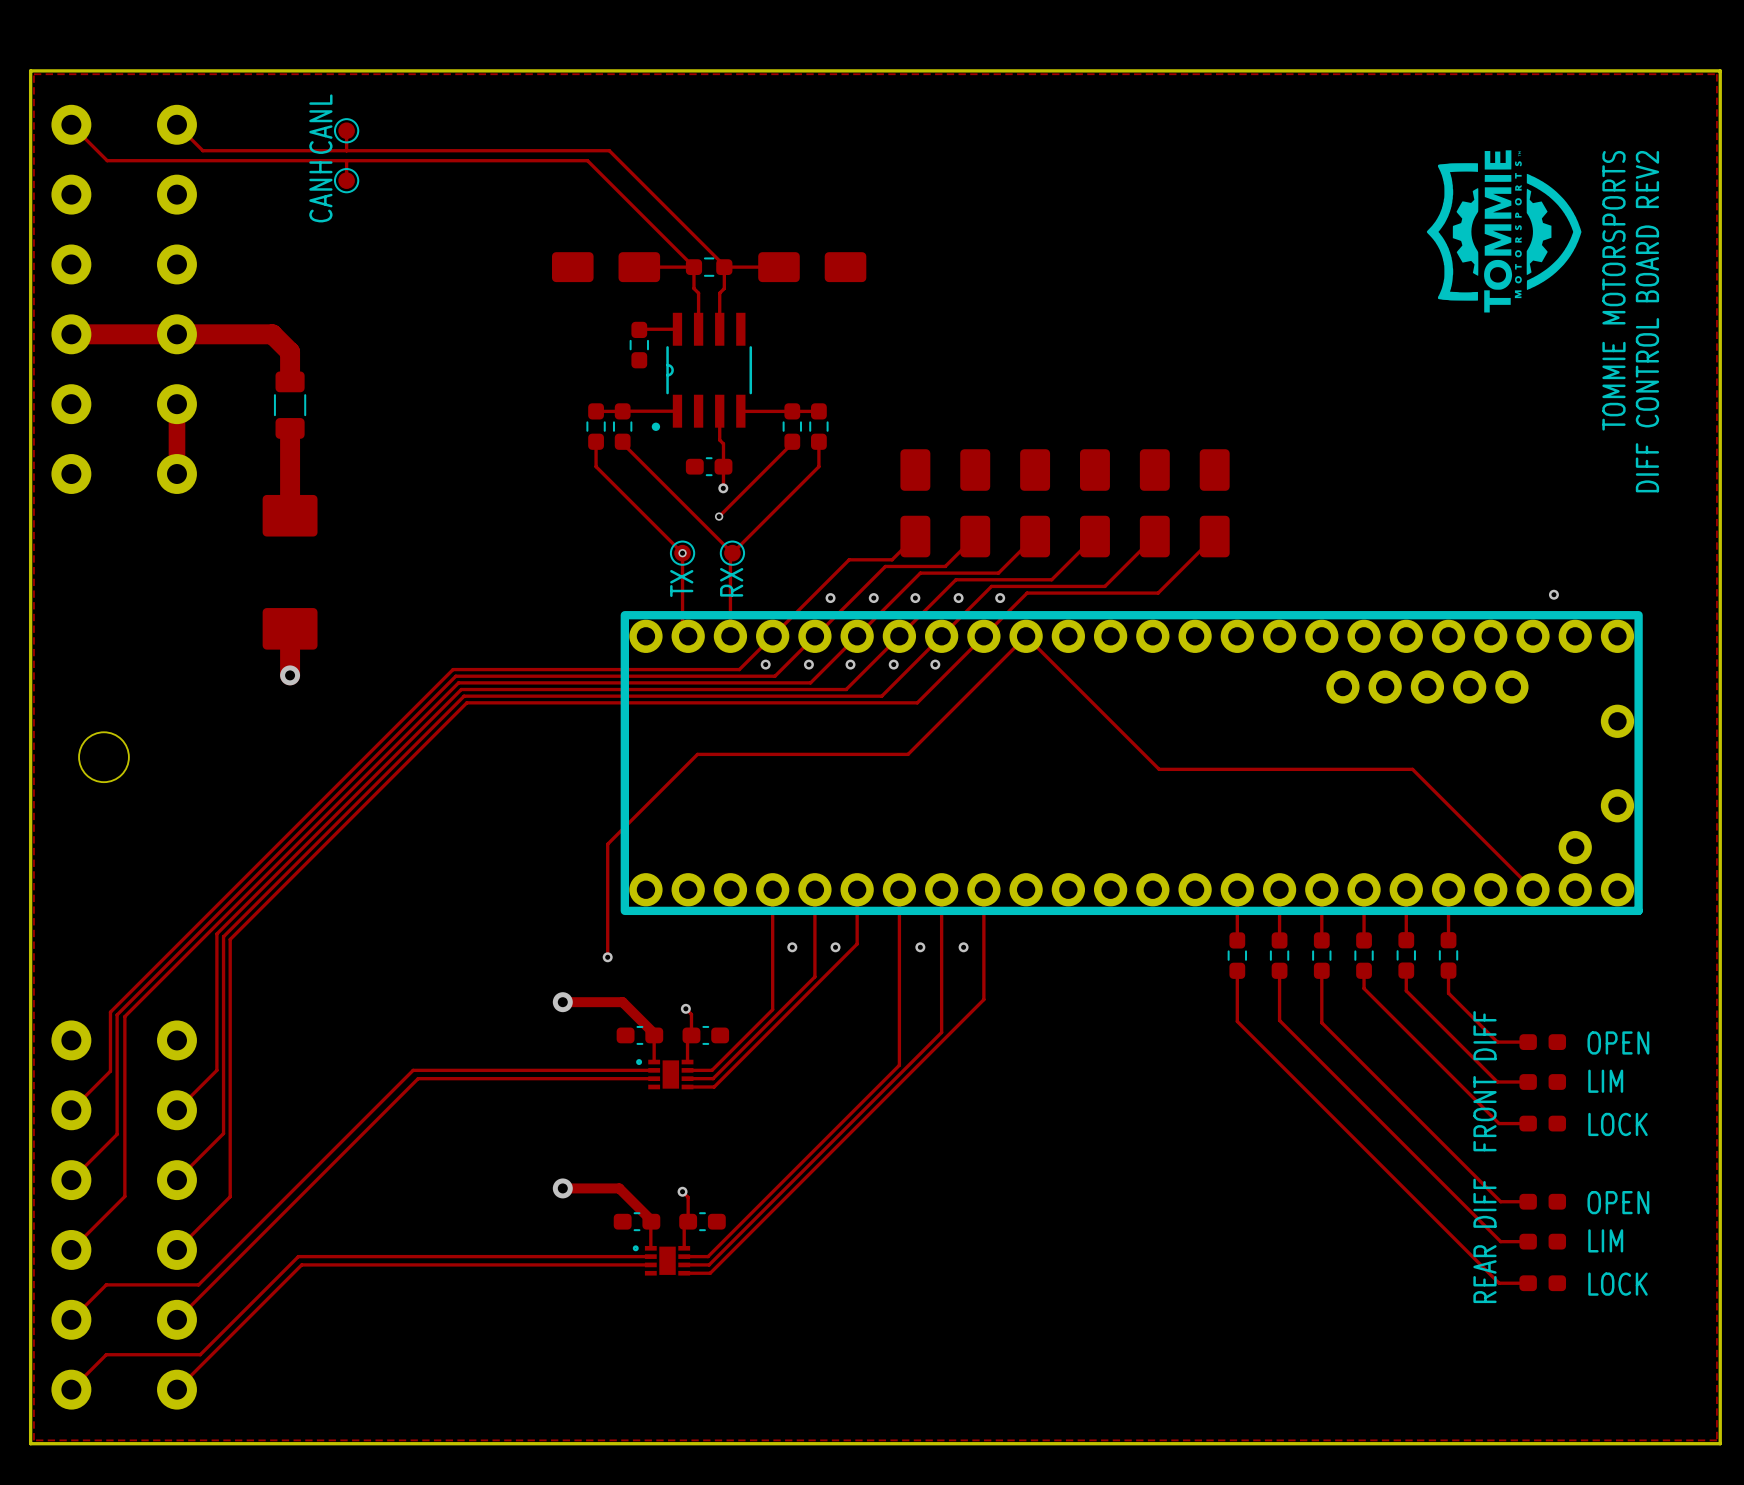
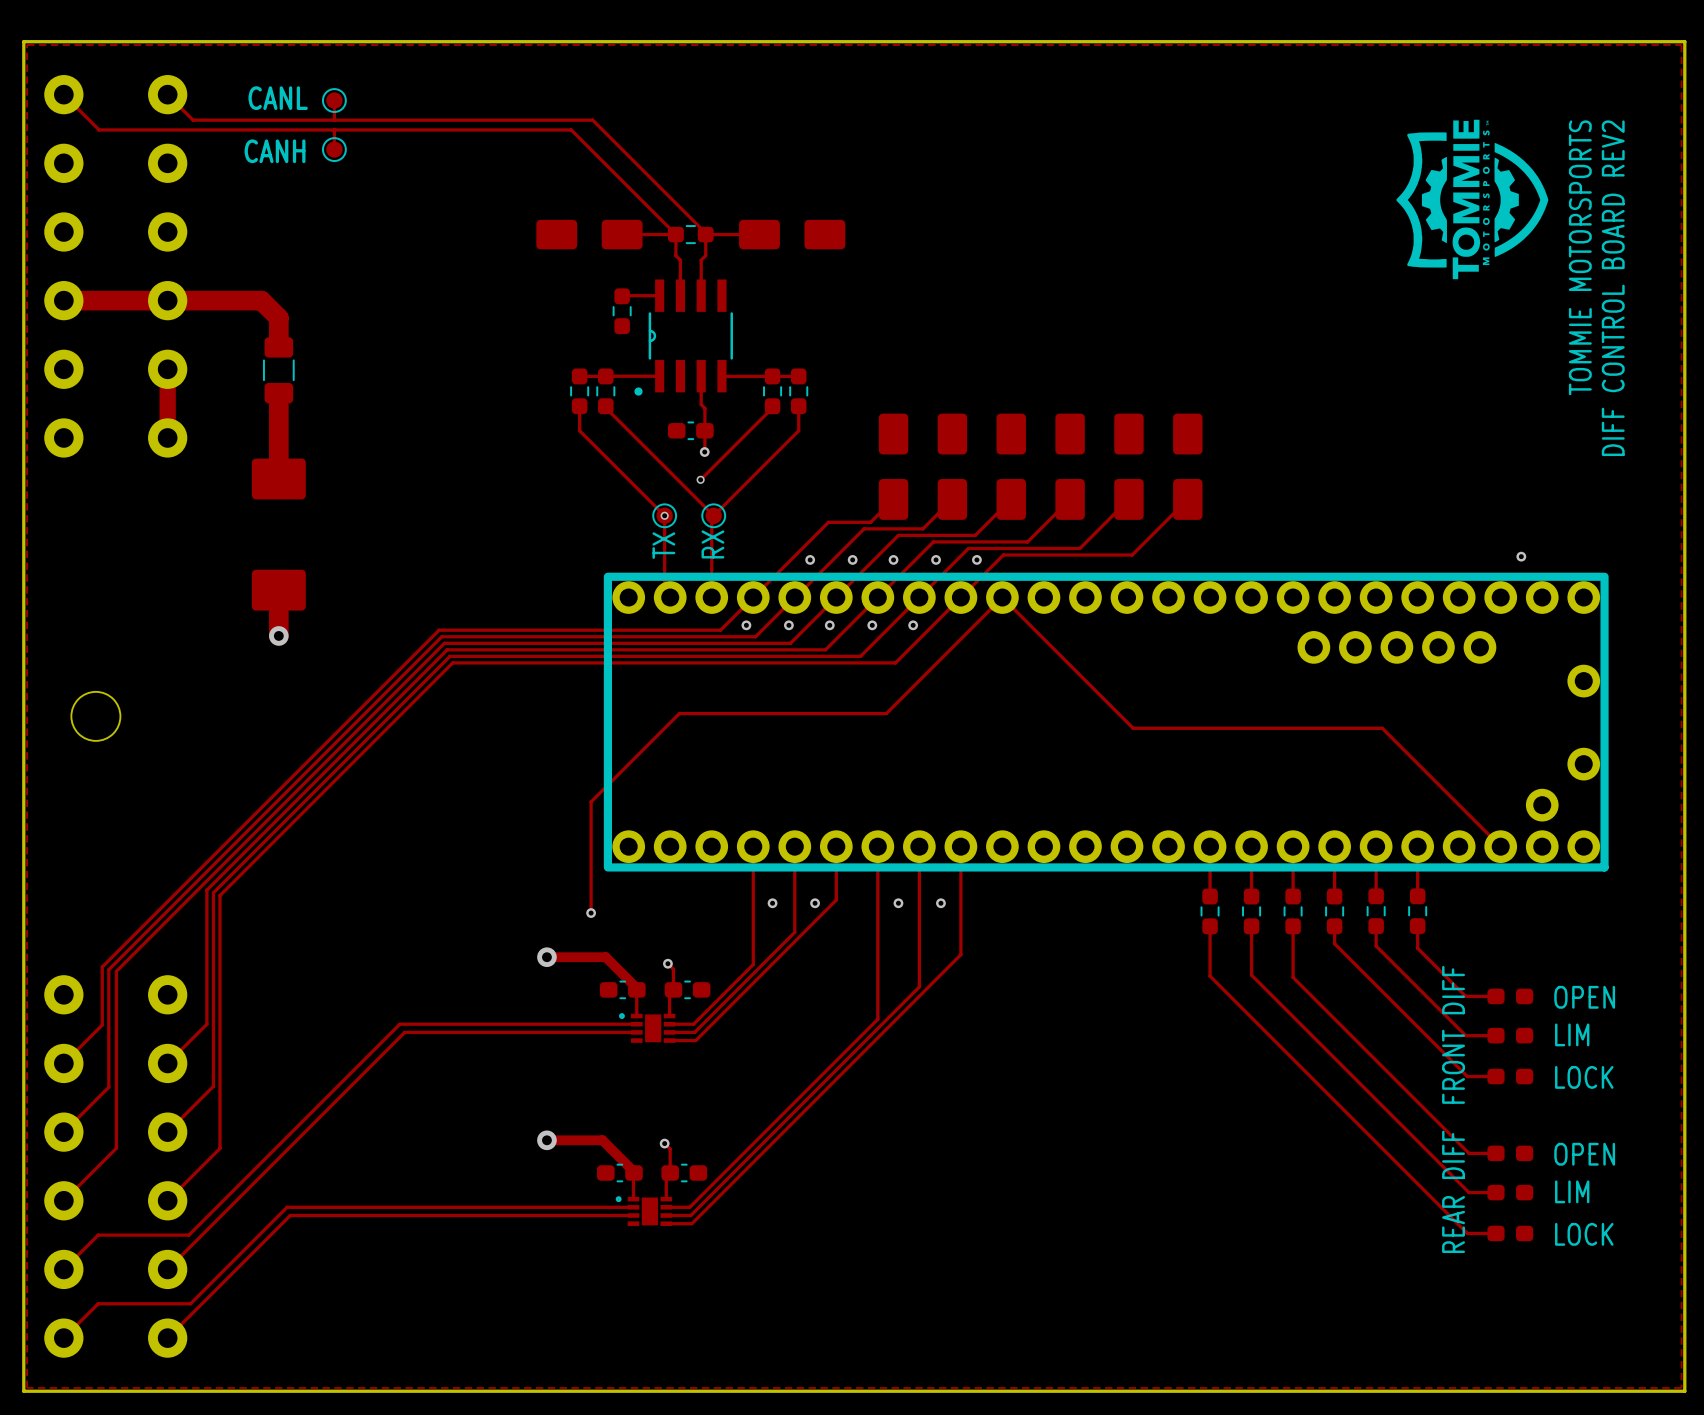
CANL name rotation: 0° (320, 124) -> 90° clockwise (278, 98)
CANH name rotation: 0° (320, 191) -> 90° clockwise (275, 151)

